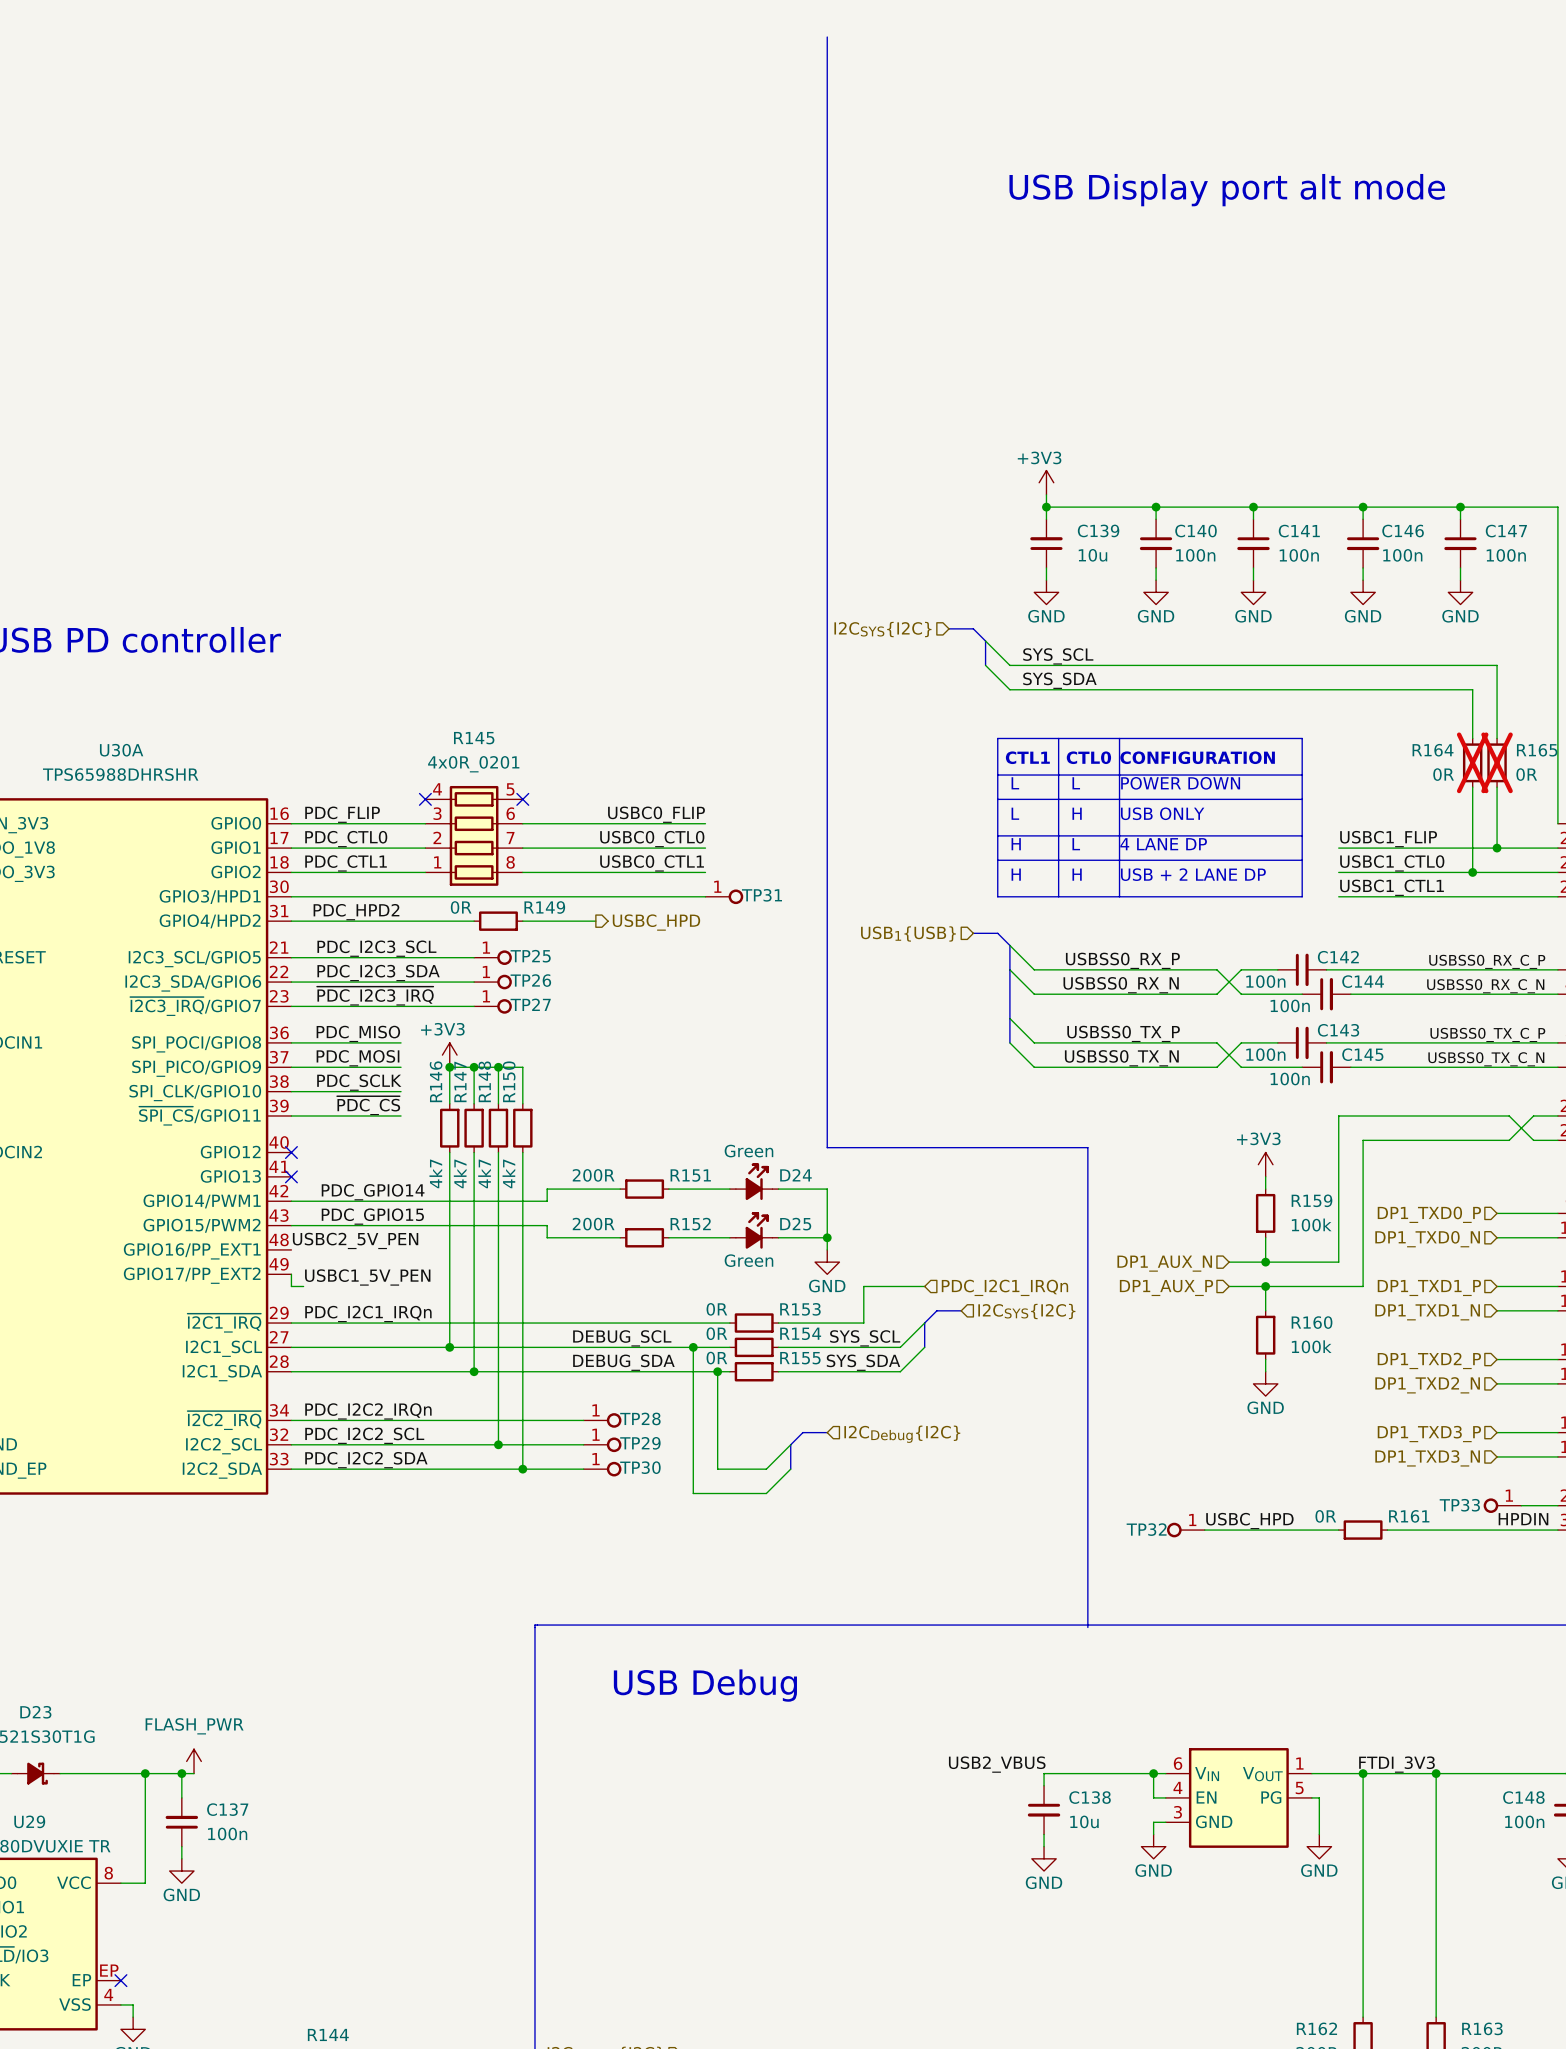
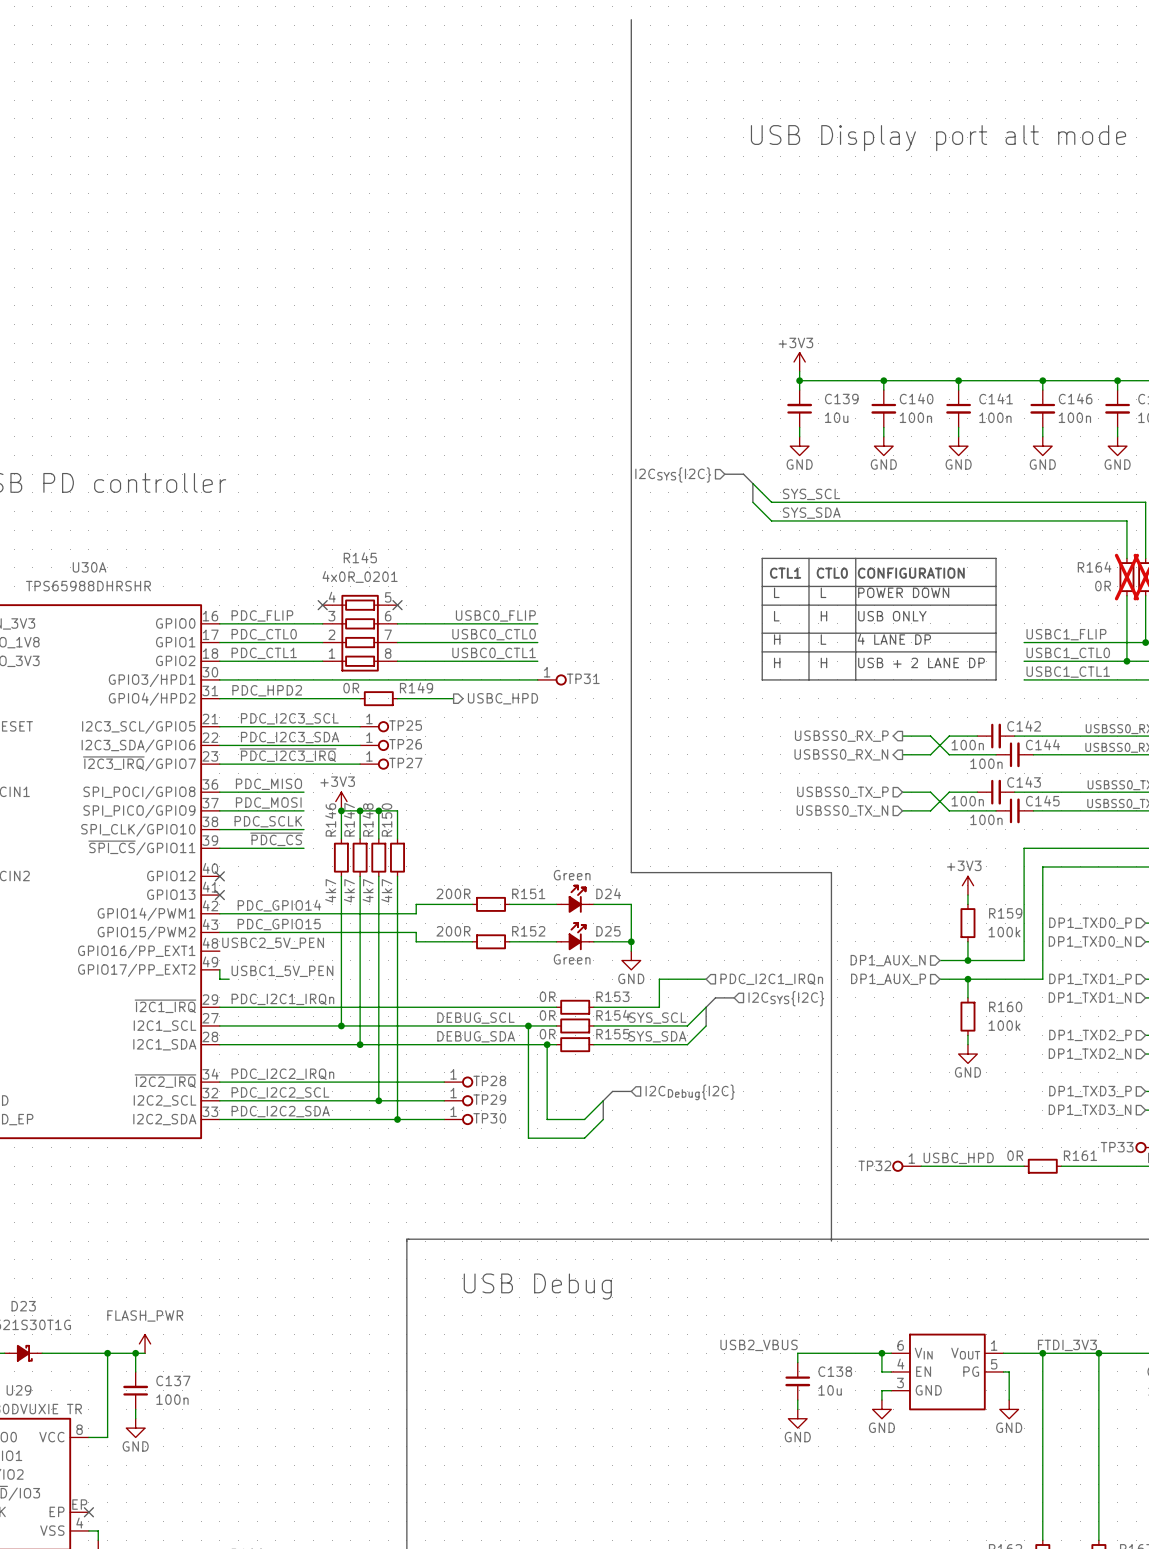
hierarchical label: USB1{USB} (908, 933) -> none
bus: (973, 933) (997, 933) (1009, 945) (1009, 1042) -> none
wire: (1009, 945) (1034, 969) (1180, 969) -> none
label: USBSS0_RX_P (1122, 960) -> none
wire: (1009, 969) (1034, 994) (1180, 994) -> none
hierarchical label: none -> USBSS0_RX_P (841, 736)
label: USBSS0_RX_N (1121, 985) -> none
hierarchical label: none -> USBSS0_RX_N (841, 754)
wire: (1009, 1018) (1034, 1042) (1180, 1042) -> none
label: USBSS0_TX_P (1123, 1033) -> none
wire: (1009, 1042) (1034, 1067) (1180, 1067) -> none
hierarchical label: none -> USBSS0_TX_P (842, 792)
label: USBSS0_TX_N (1121, 1058) -> none
hierarchical label: none -> USBSS0_TX_N (842, 810)

